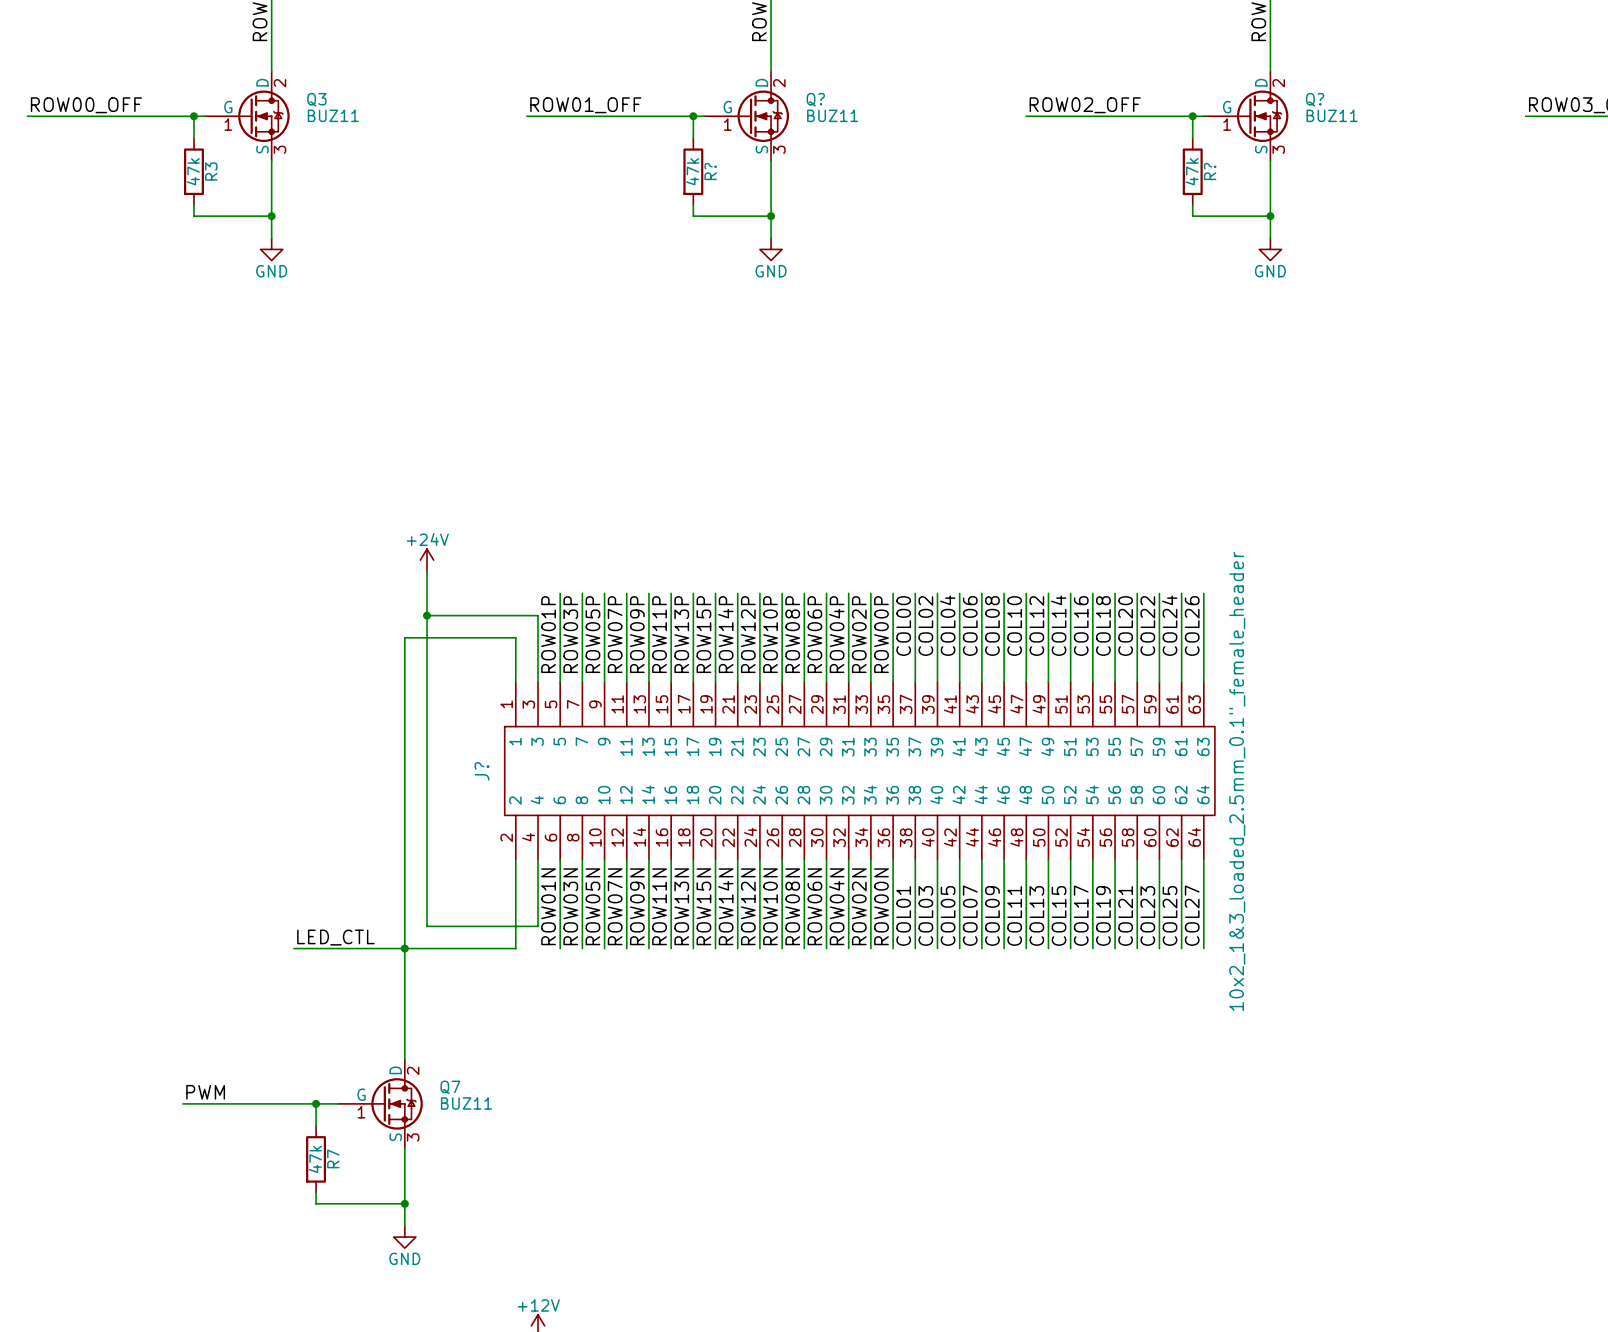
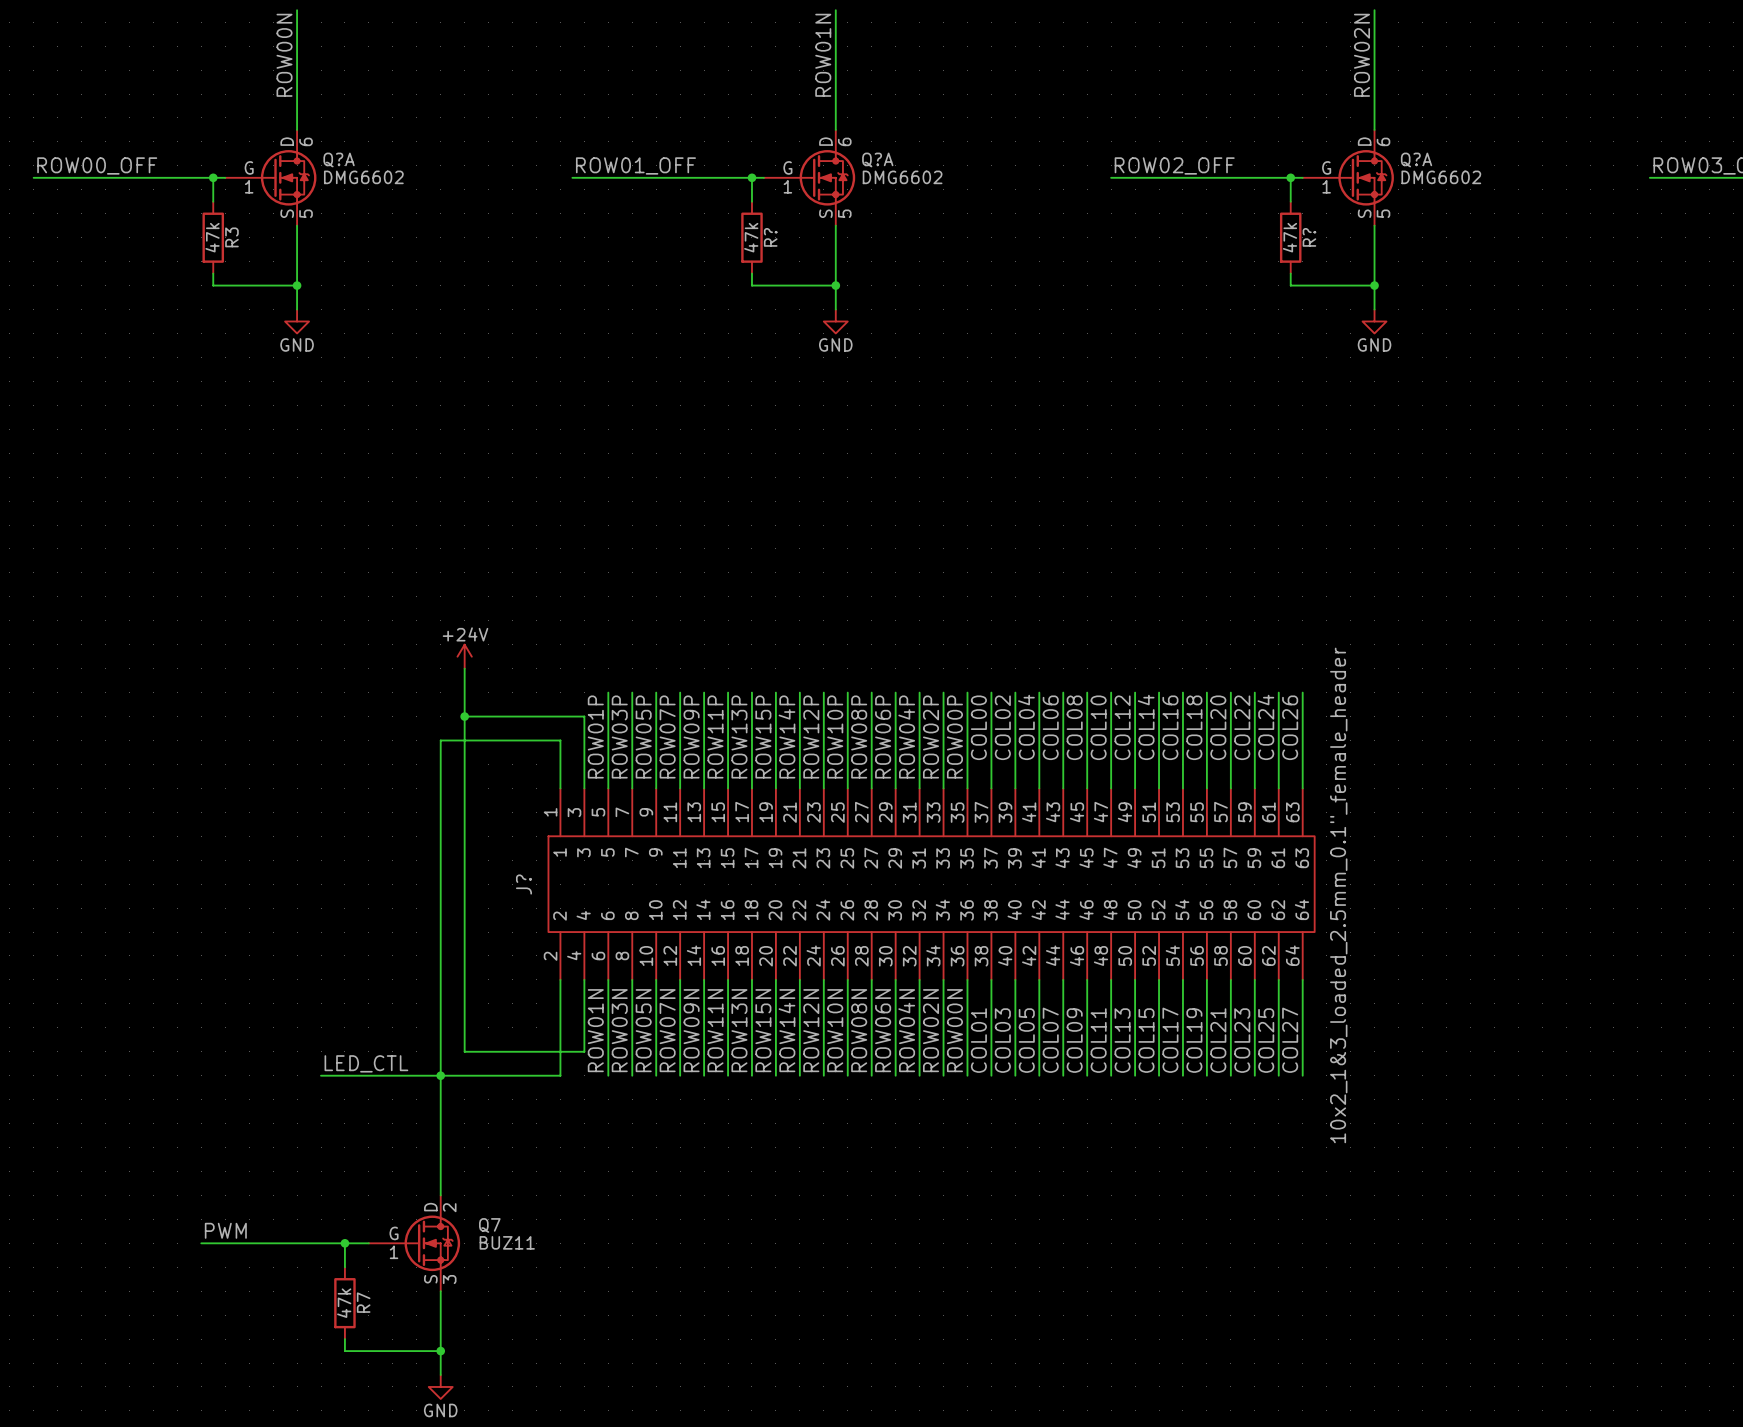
Q3: BUZ11 (247, 116) -> none
Q?A: none -> DMG6602 (270, 177)
Q?: BUZ11 (746, 116) -> none
Q?A: none -> DMG6602 (809, 177)
Q?: BUZ11 (1246, 116) -> none
Q?A: none -> DMG6602 (1348, 177)

